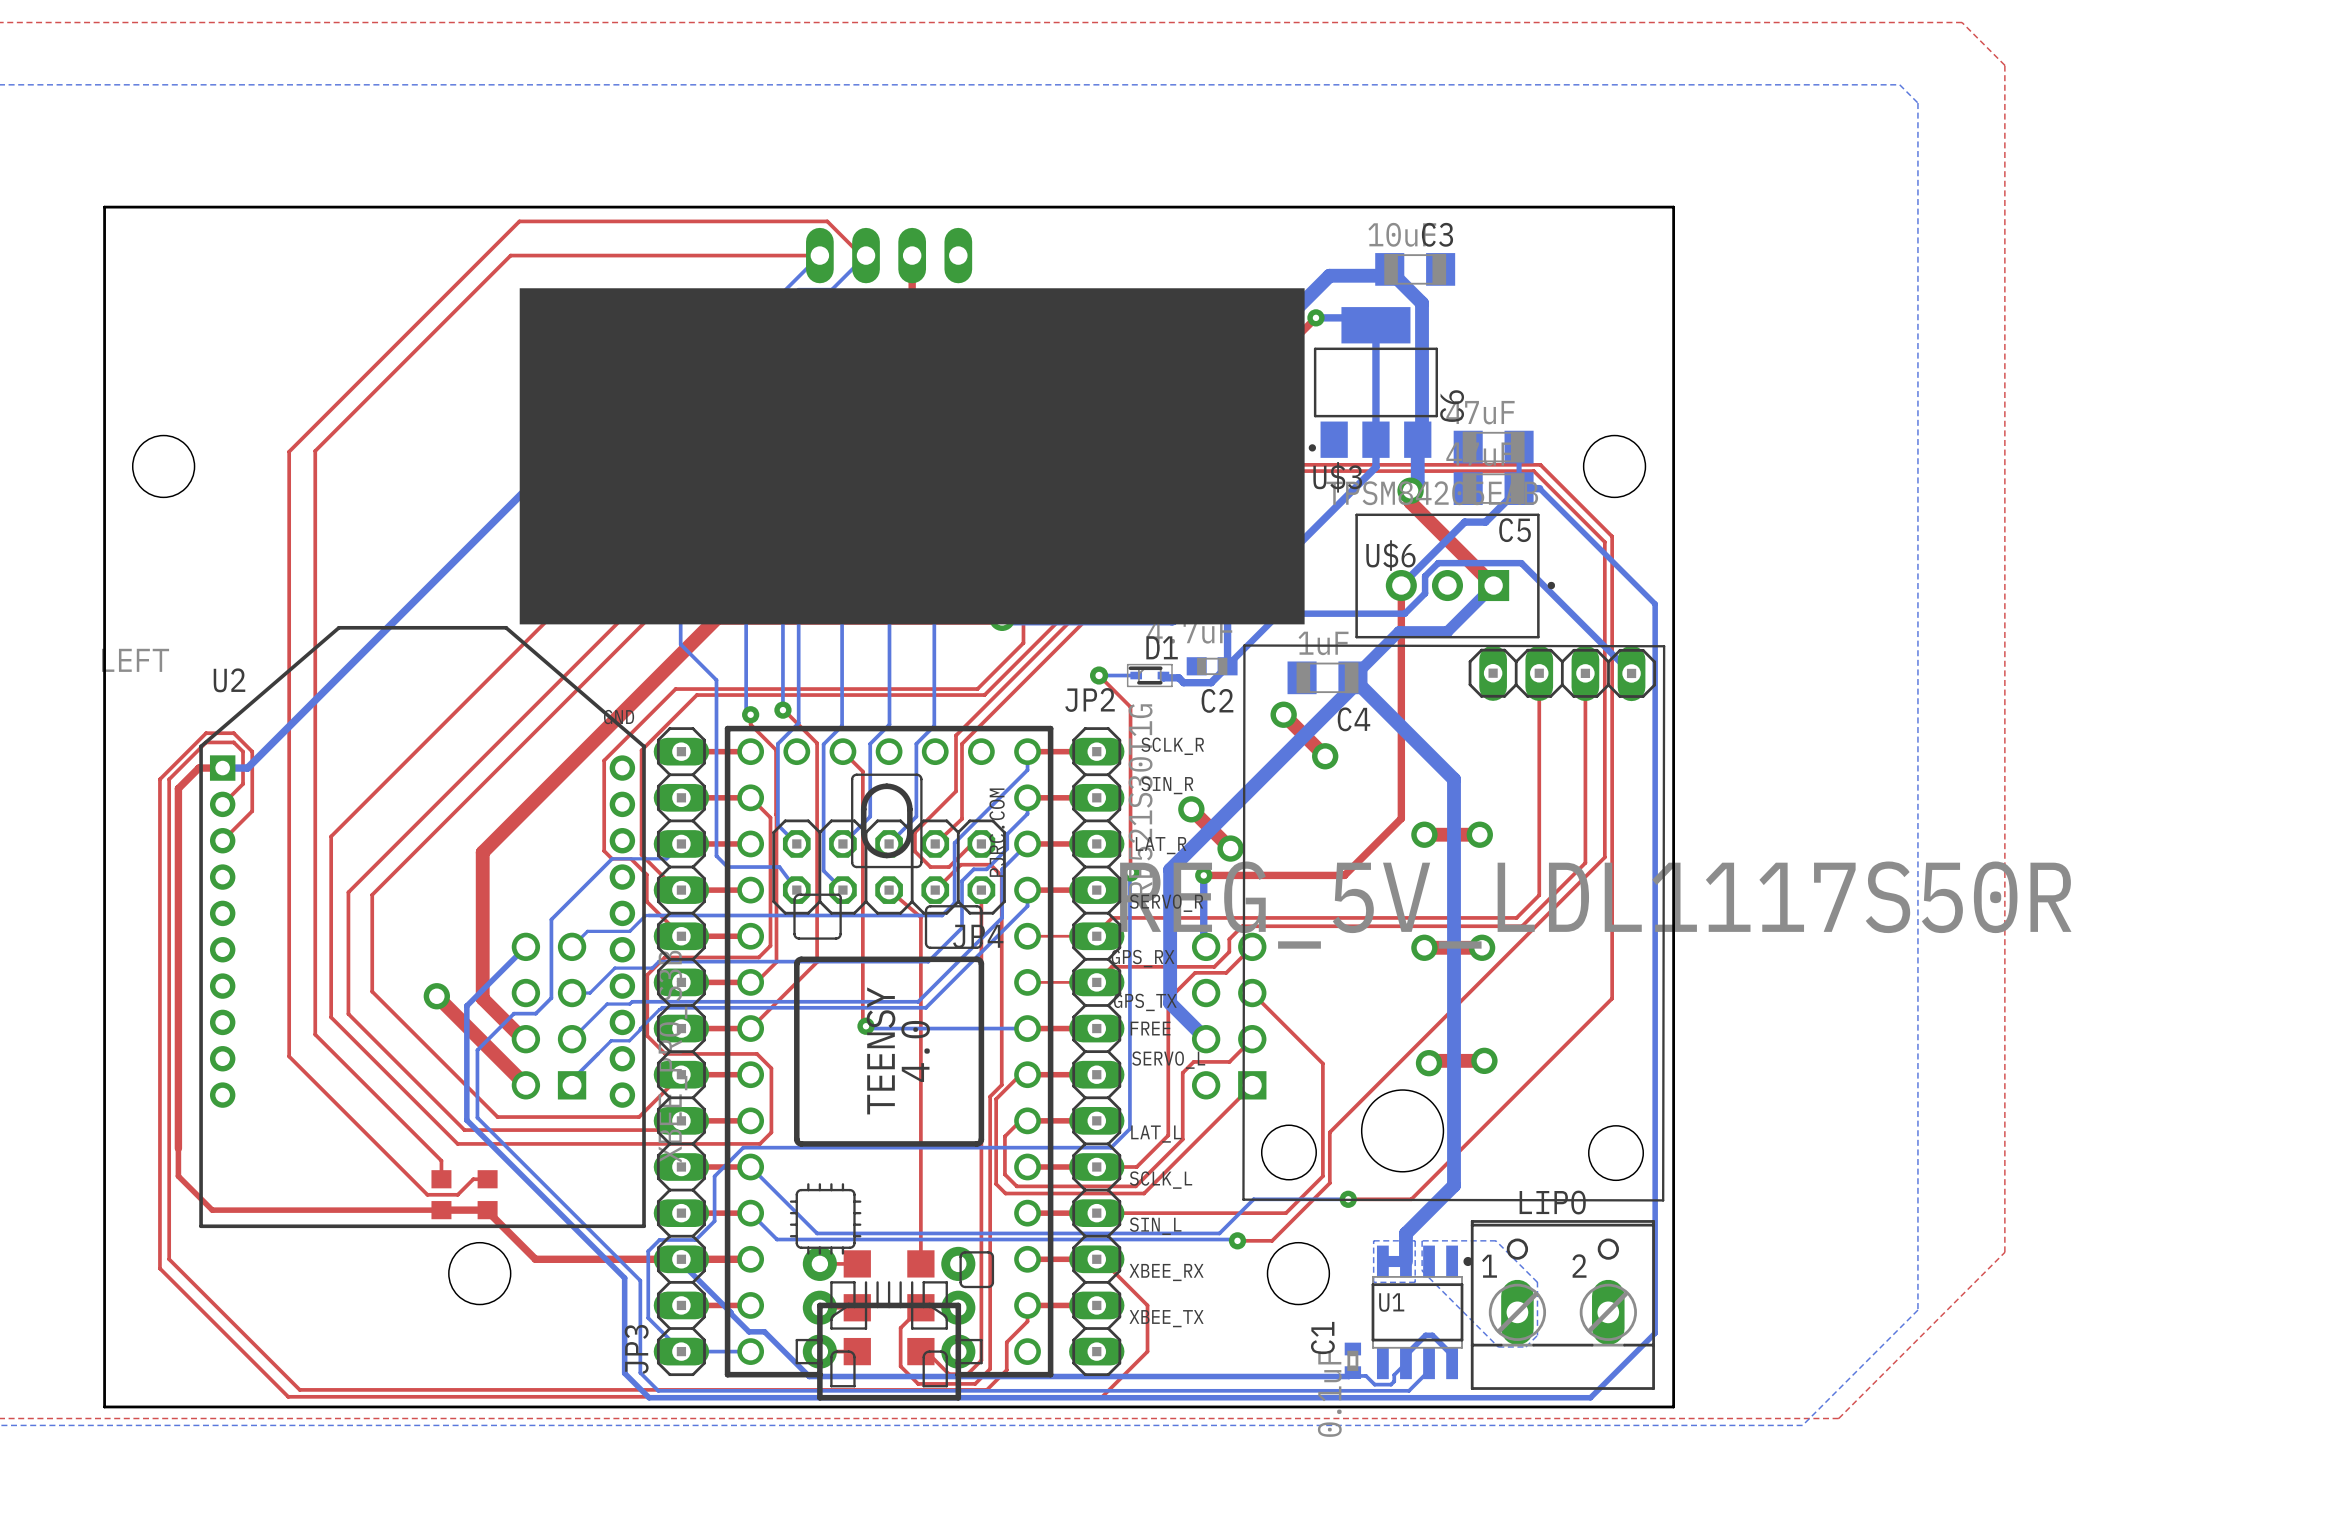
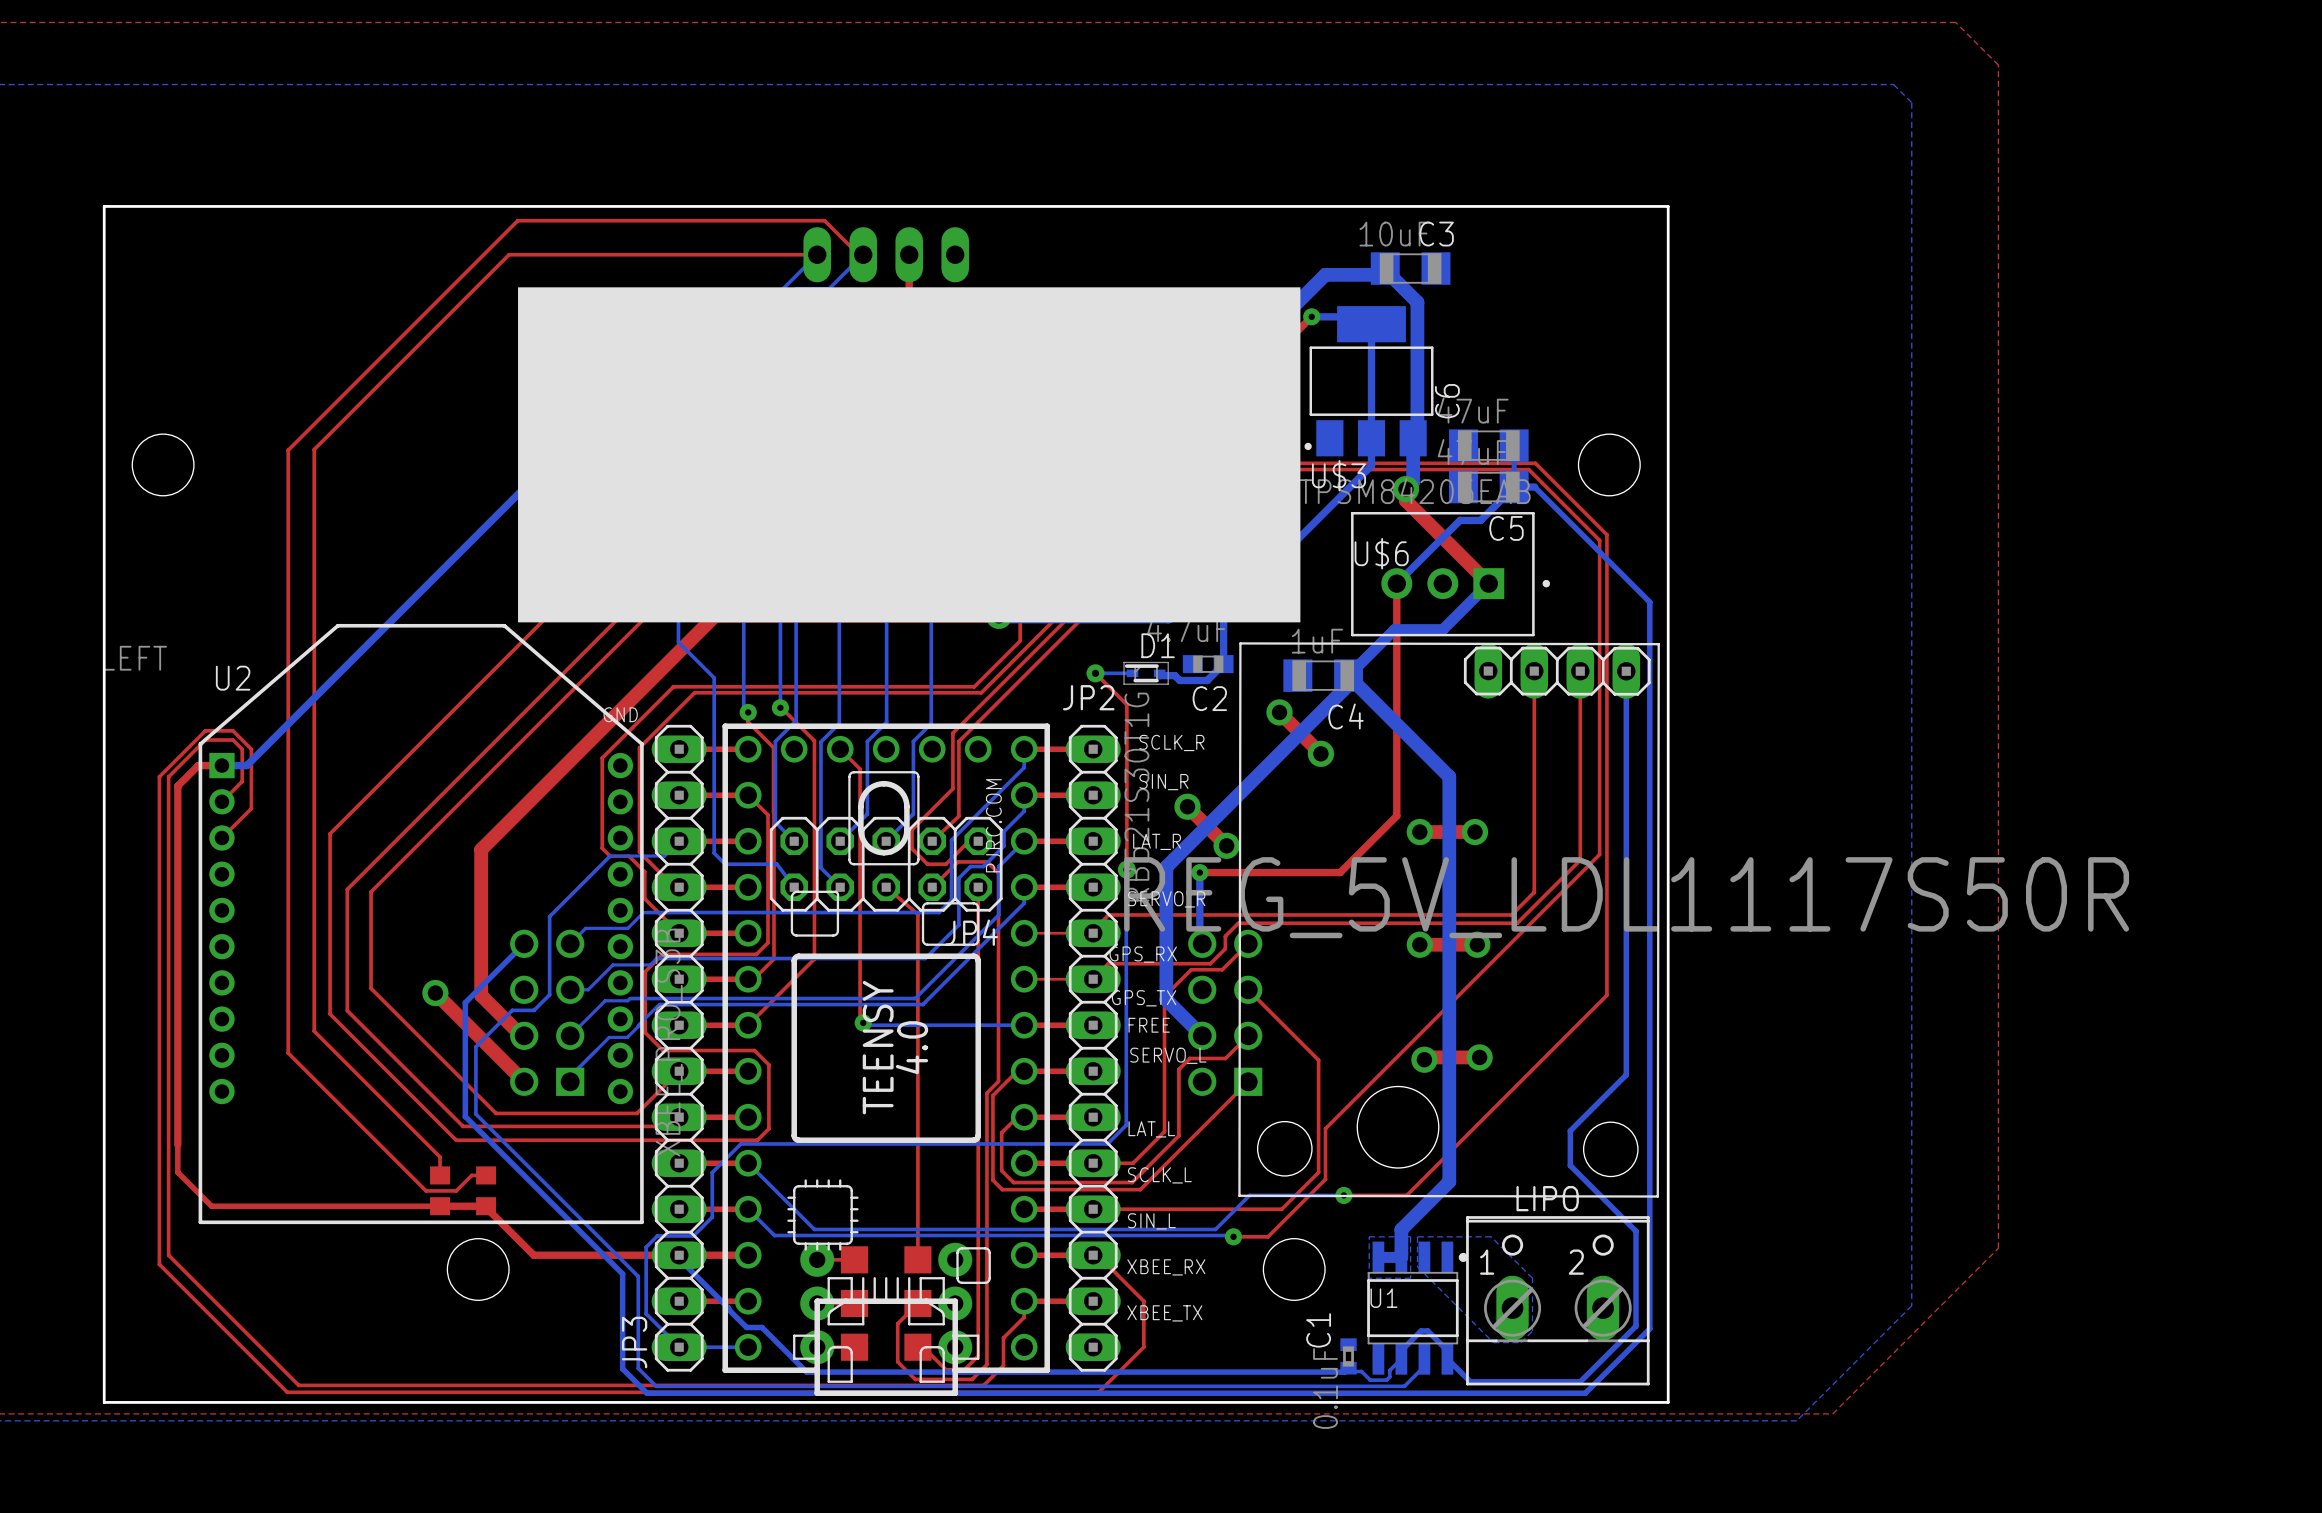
bottom track: (1227, 666) (1279, 613) (1404, 613) (1425, 593) (1425, 576) (1438, 563) (1521, 563) (1631, 673) -> (1447, 1358) (1470, 1381) (1580, 1381) (1636, 1326) (1636, 1231) (1570, 1165) (1570, 1130) (1626, 1074) (1626, 671)

